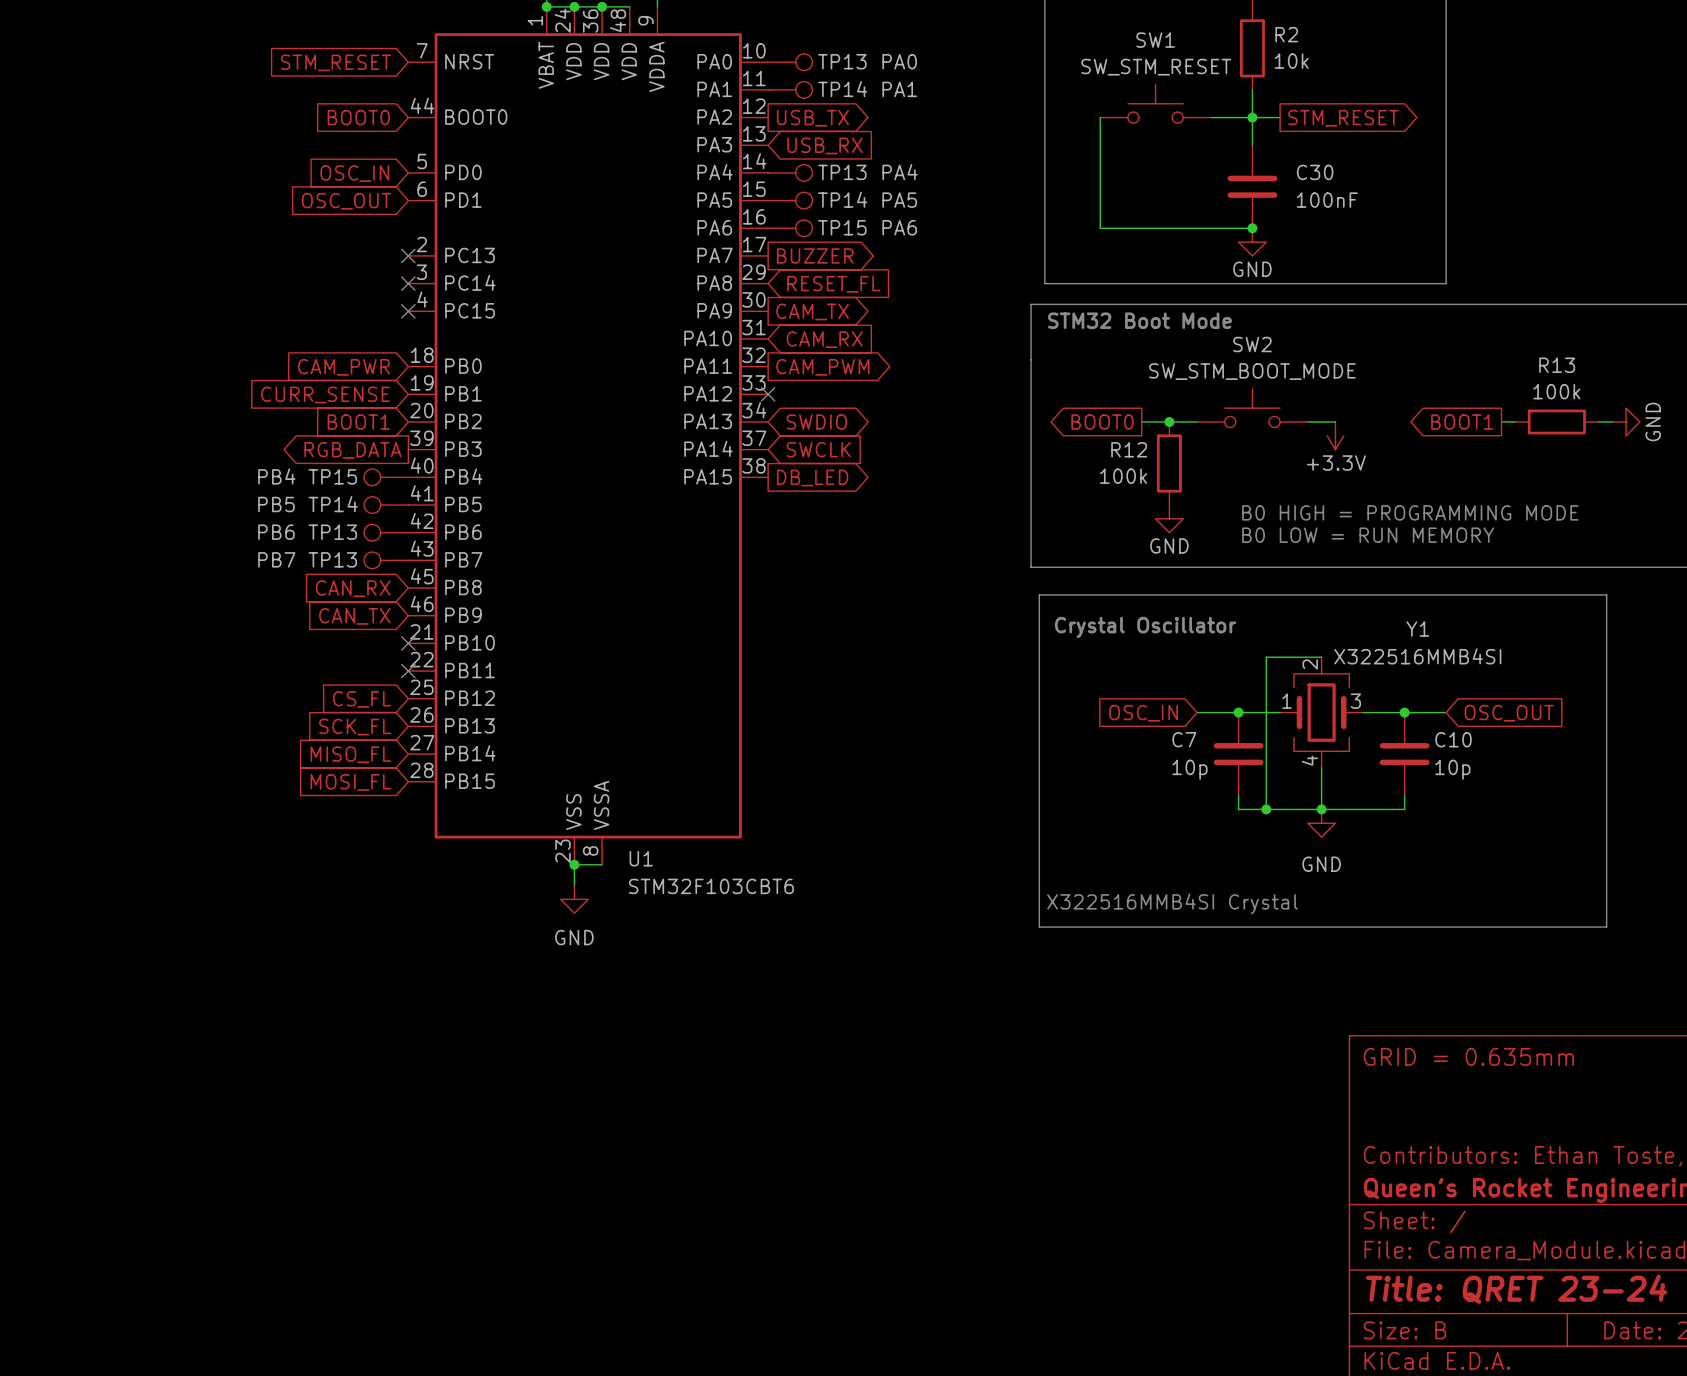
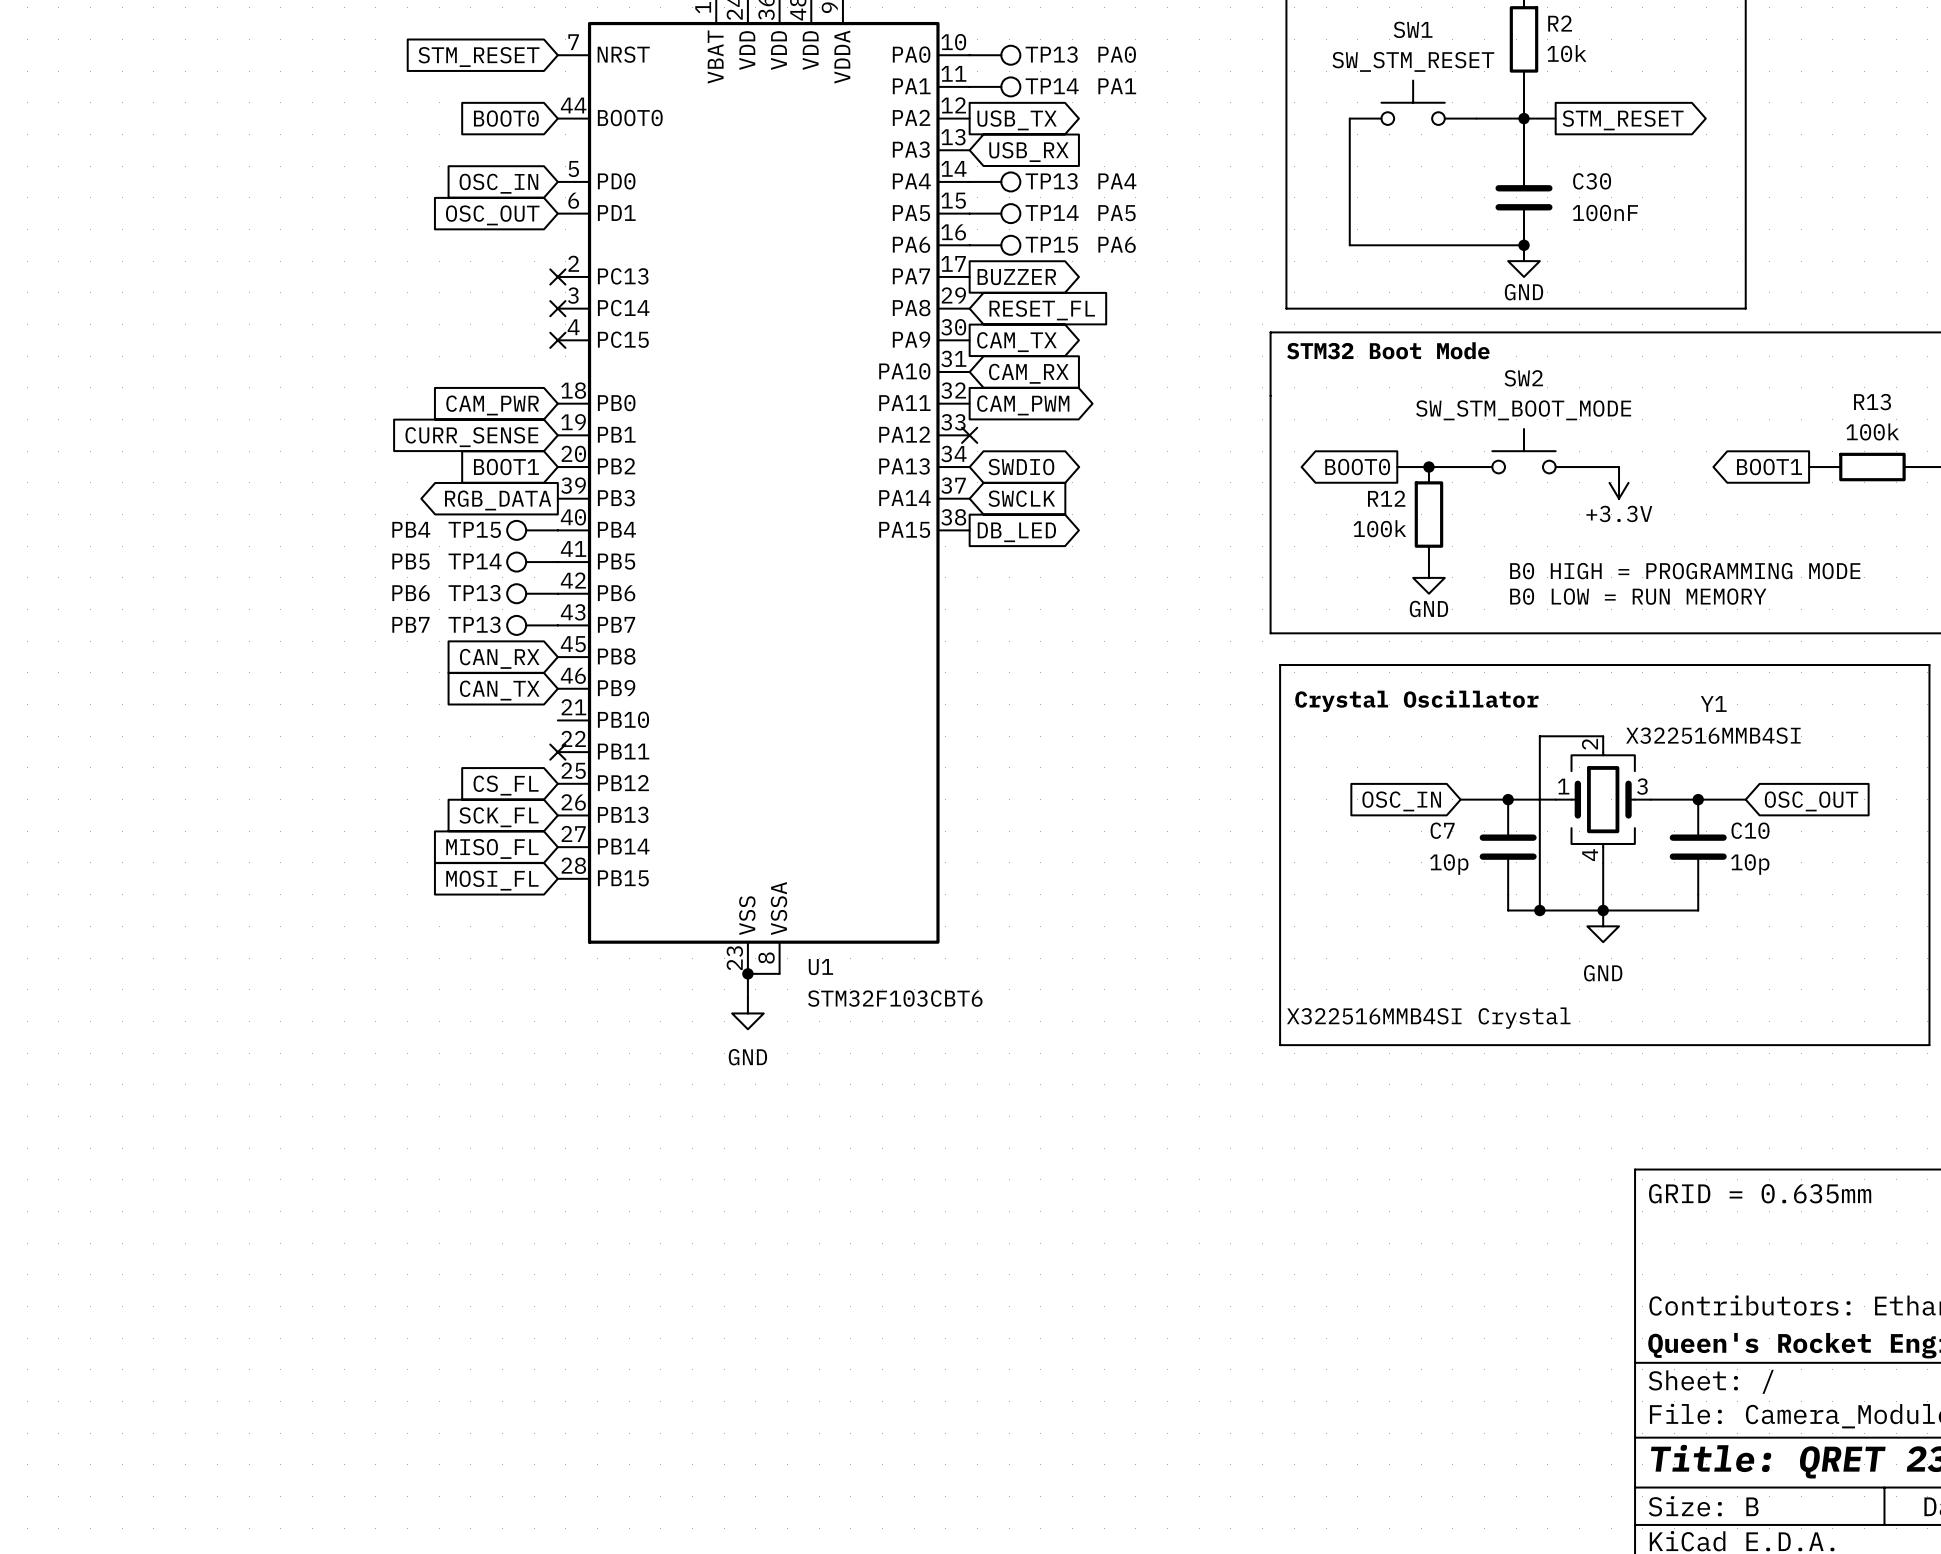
no-connect mark: (408, 643) -> none

